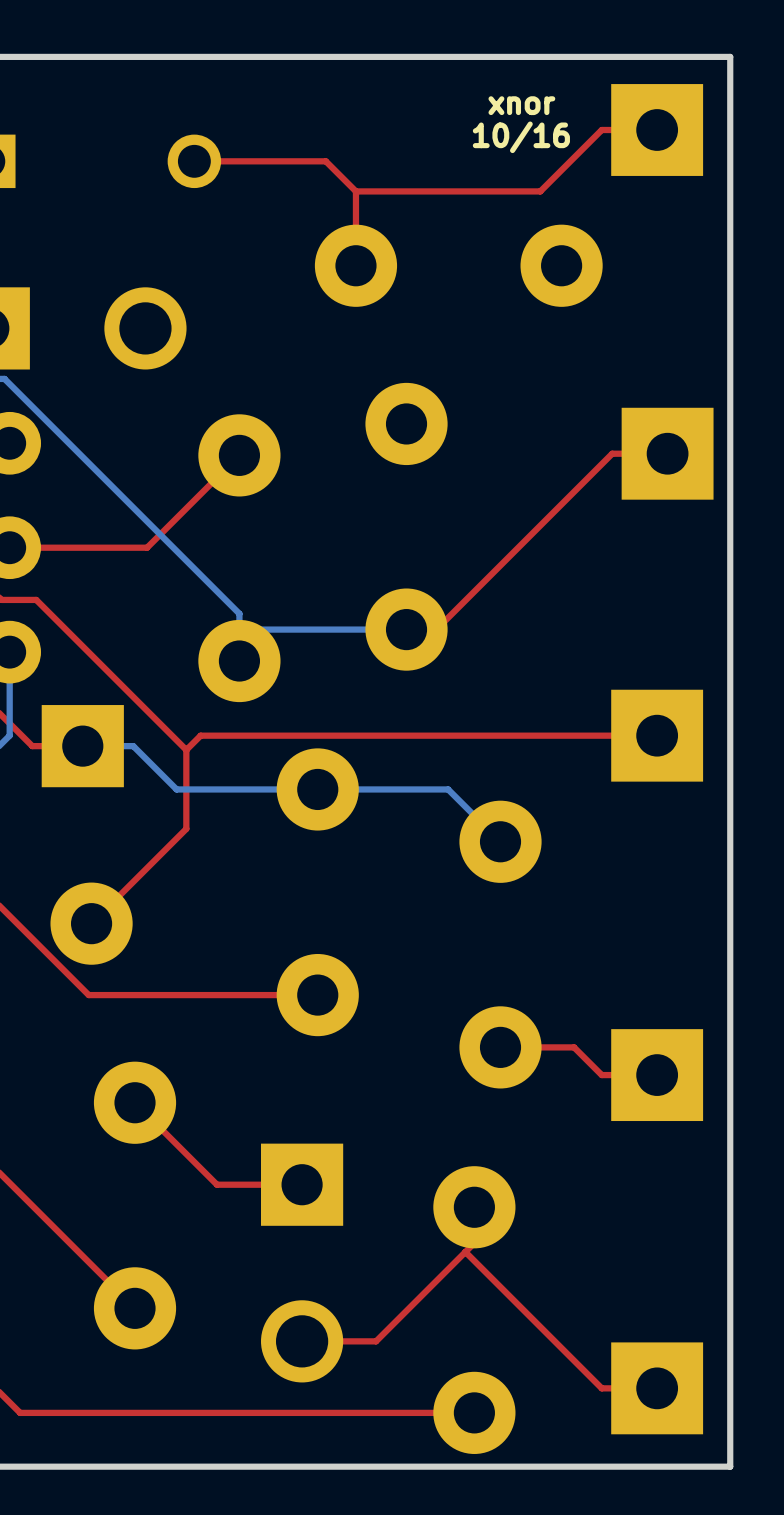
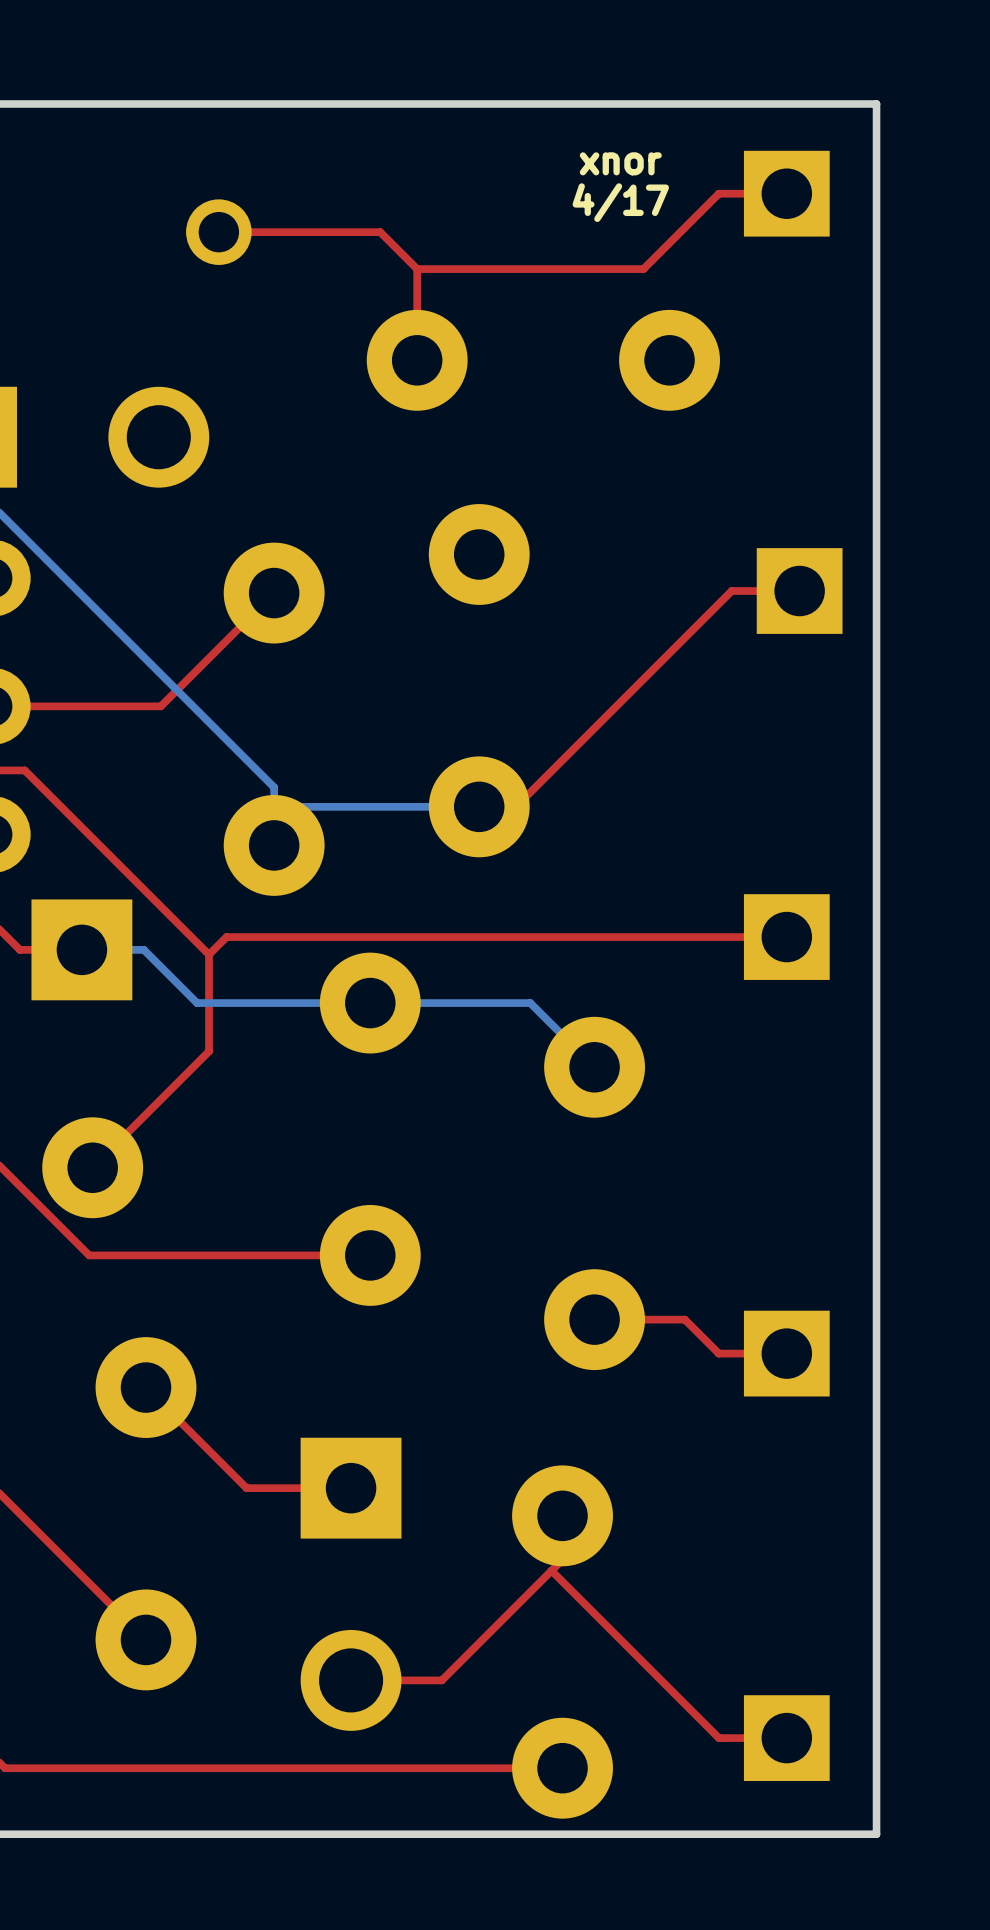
part footprint: [611, 84, 704, 176] -> [743, 150, 830, 237]
text: 10/16 (521, 137) -> 4/17 (620, 202)
part footprint: [621, 407, 714, 500] -> [756, 548, 843, 634]
part footprint: [611, 689, 704, 782] -> [743, 894, 830, 980]
part footprint: [611, 1029, 704, 1122] -> [743, 1310, 830, 1397]
part footprint: [611, 1342, 704, 1435] -> [743, 1695, 830, 1781]

